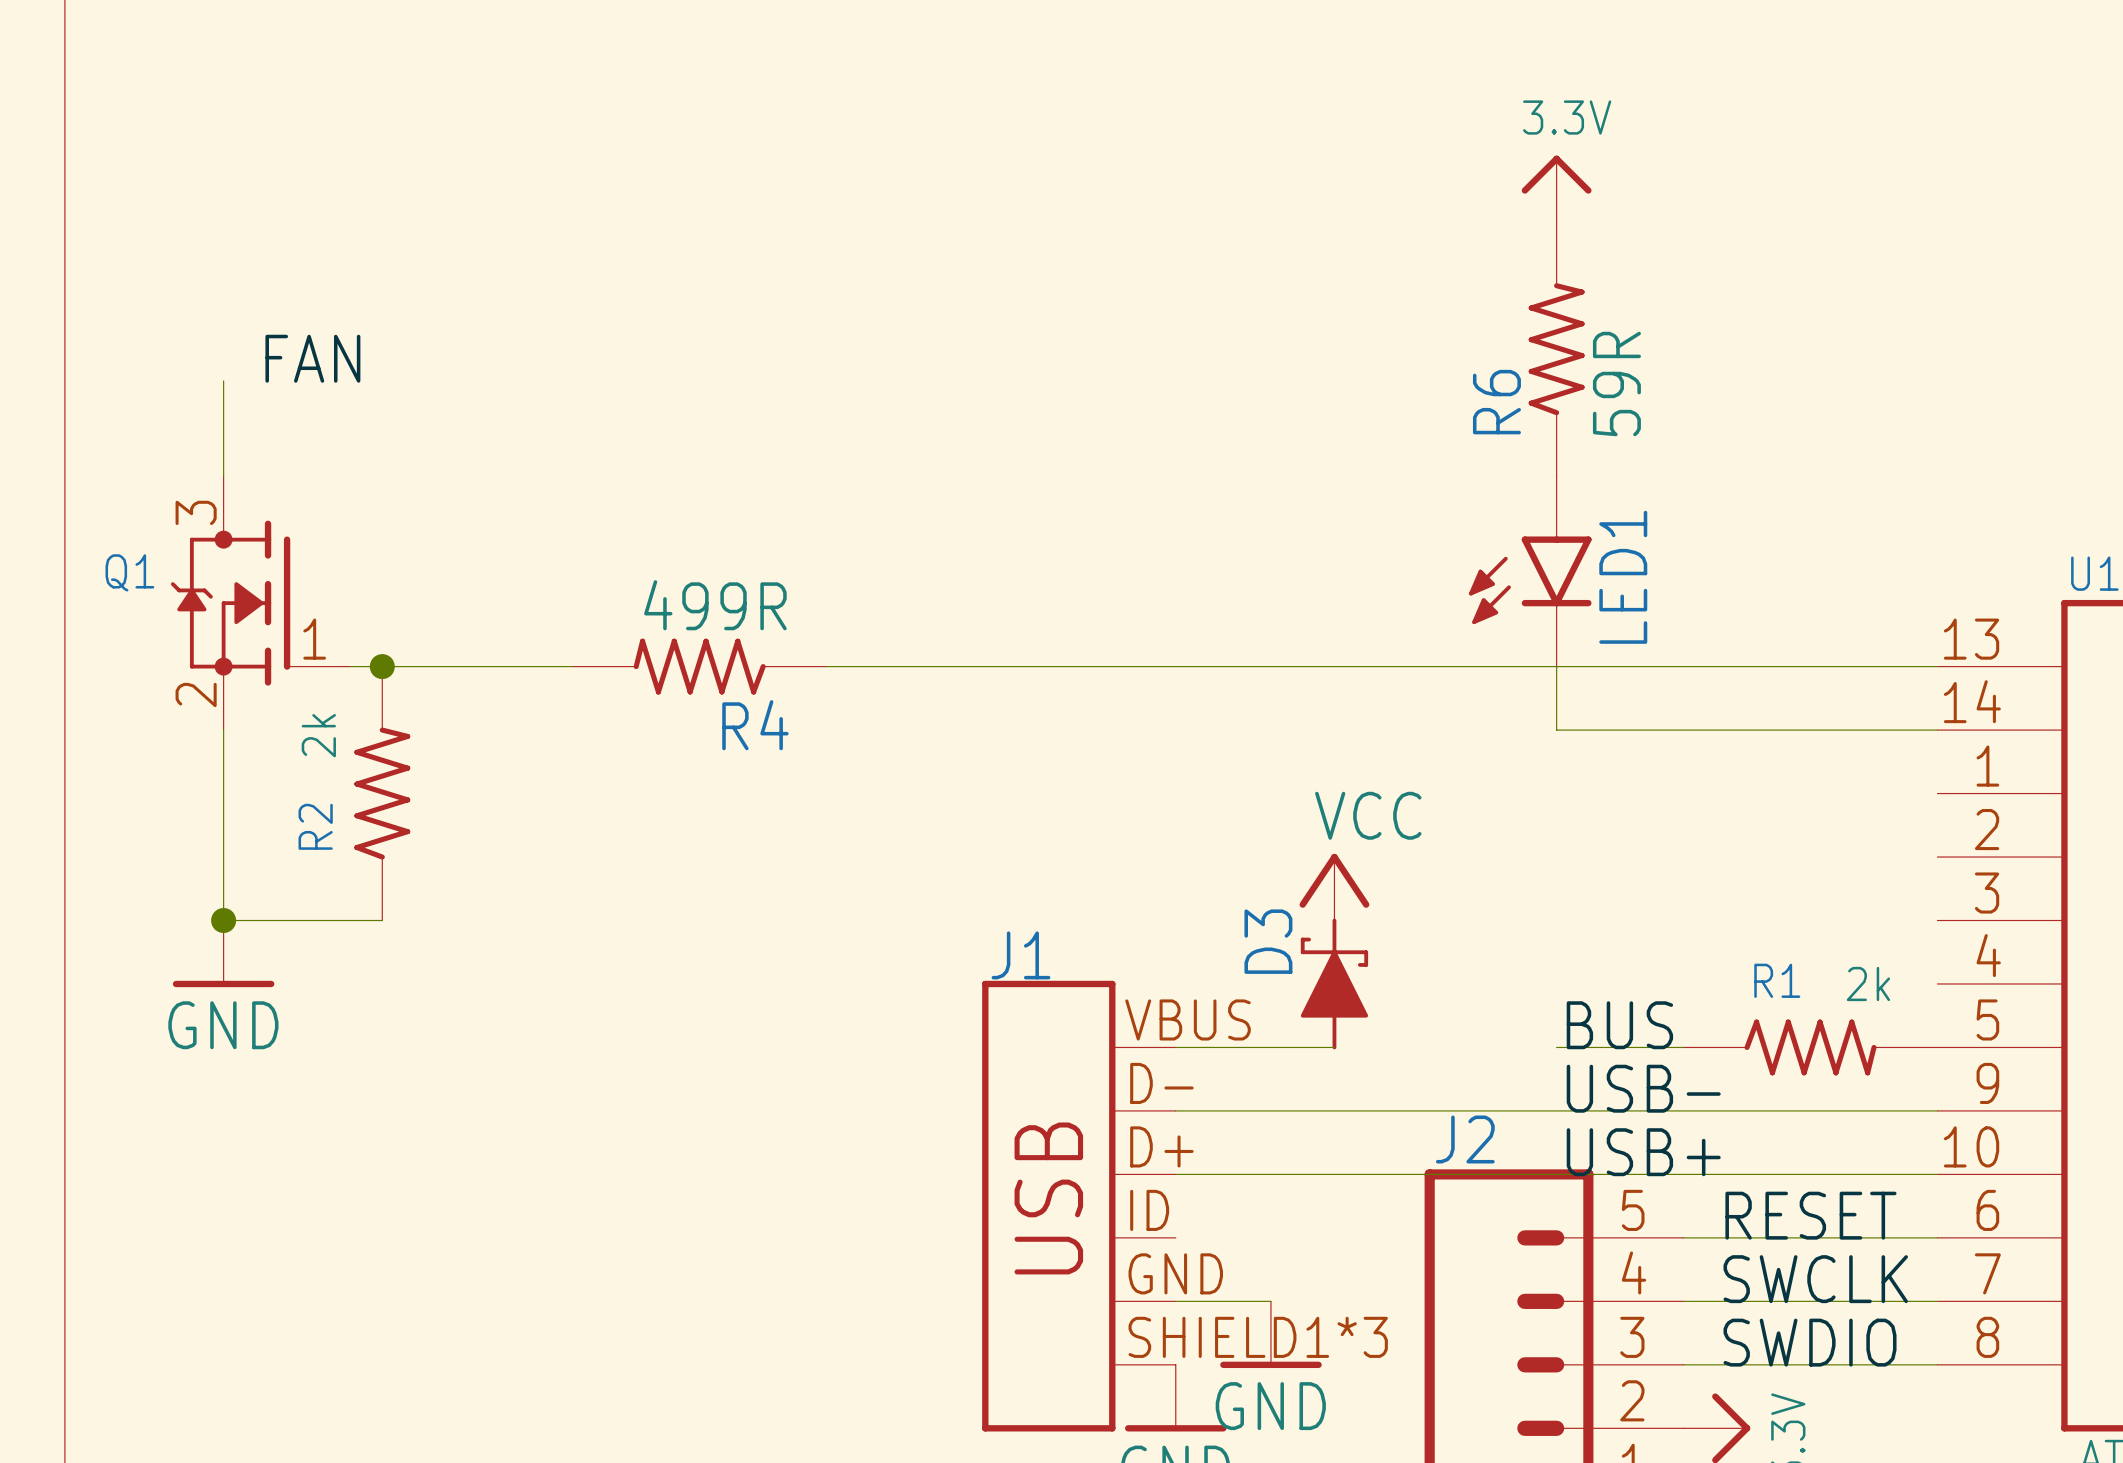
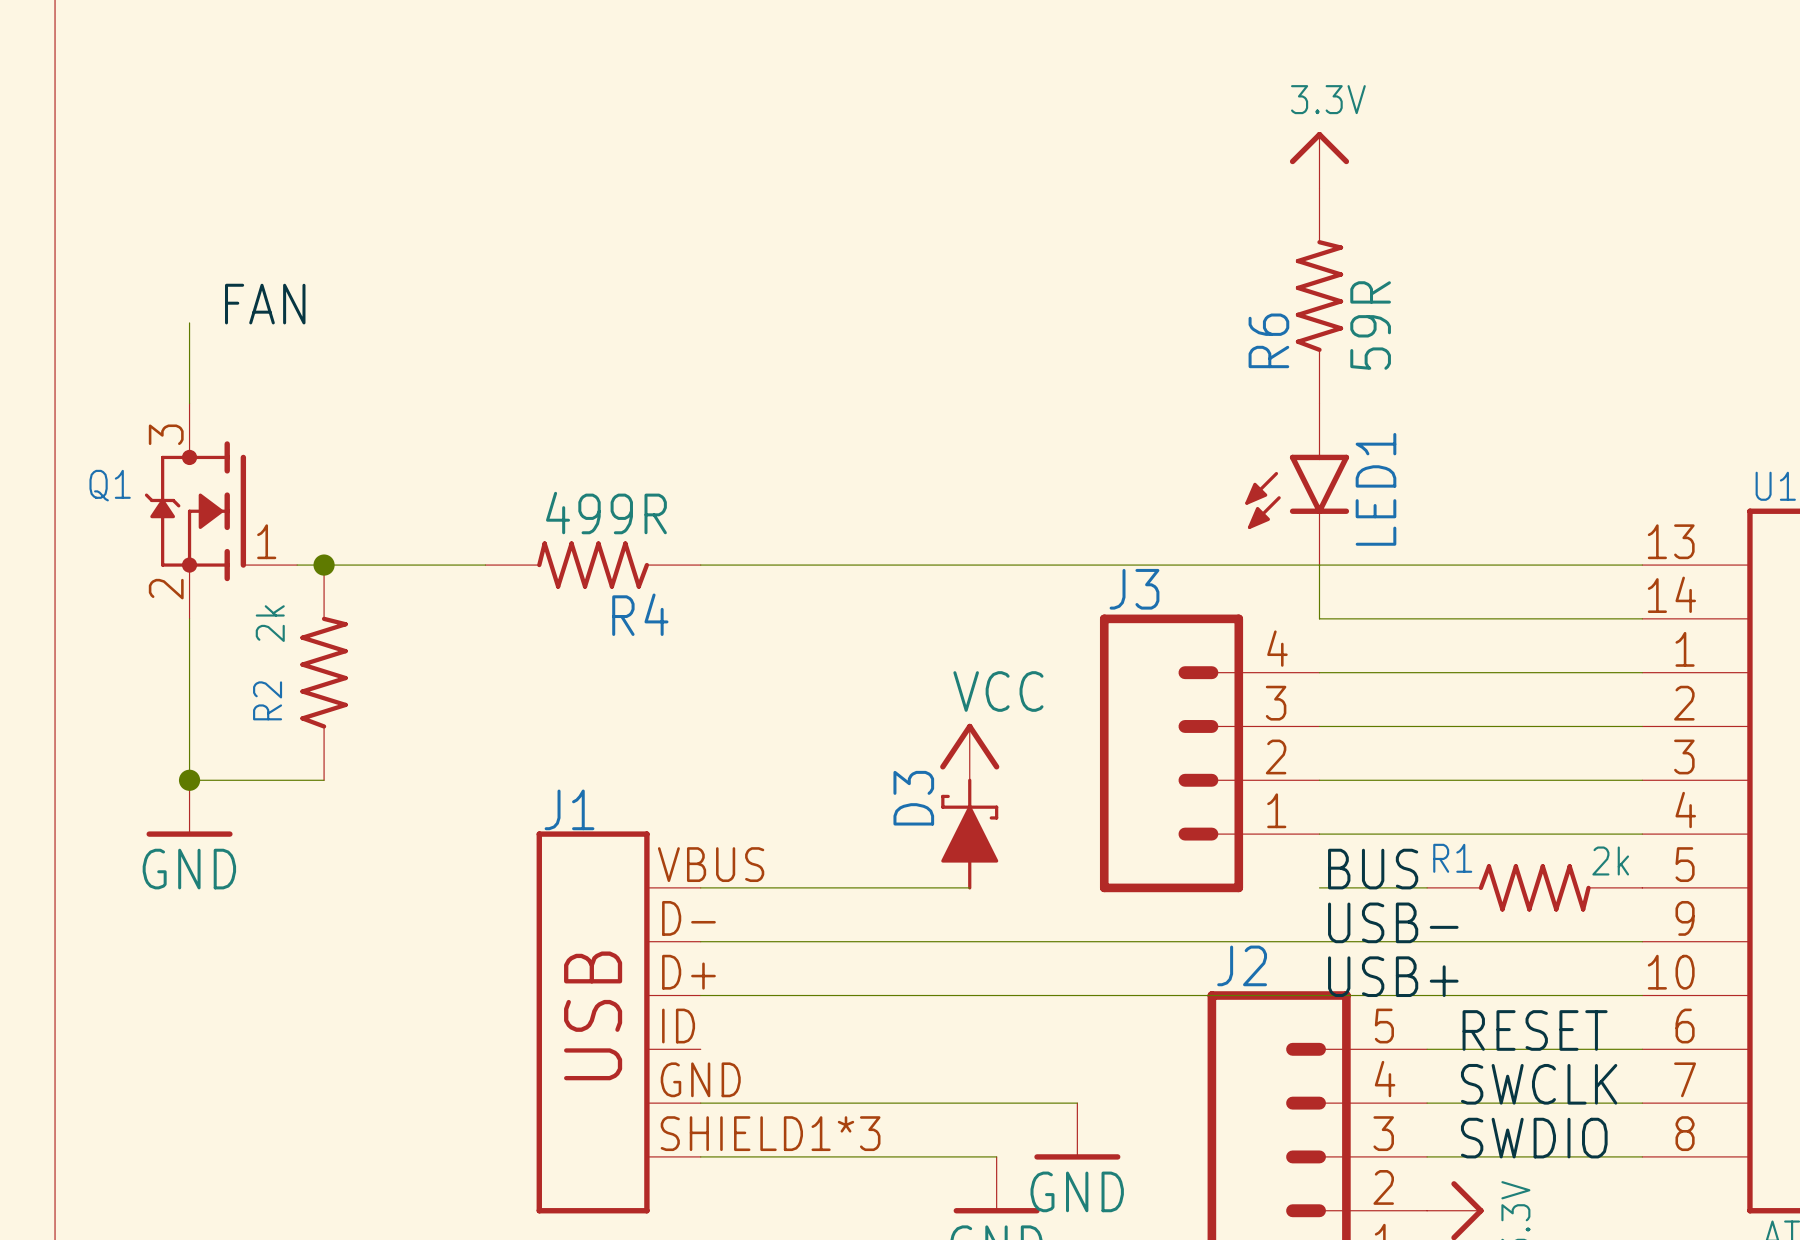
wire: none -> (1319, 672) (1642, 672)
wire: none -> (1319, 726) (1642, 726)
power symbol position: VCC (1334, 887) -> VCC (969, 752)
J3: none -> (1209, 753)
wire: none -> (1319, 780) (1642, 780)
R1 name position: R1 (1777, 980) -> R1 (1452, 858)
D3 position: (1334, 983) -> (969, 834)
wire: none -> (1319, 834) (1642, 834)
R1 value position: 2k (1868, 983) -> 2k (1610, 860)
wire: none -> (700, 887) (969, 887)
wire: (1175, 1047) (1334, 1047) -> none
wire: none -> (700, 941) (996, 941)
wire: none -> (700, 995) (996, 995)
J1 position: (1078, 1206) -> (618, 1022)
wire: none -> (700, 1103) (996, 1103)
wire: none -> (700, 1156) (996, 1156)

